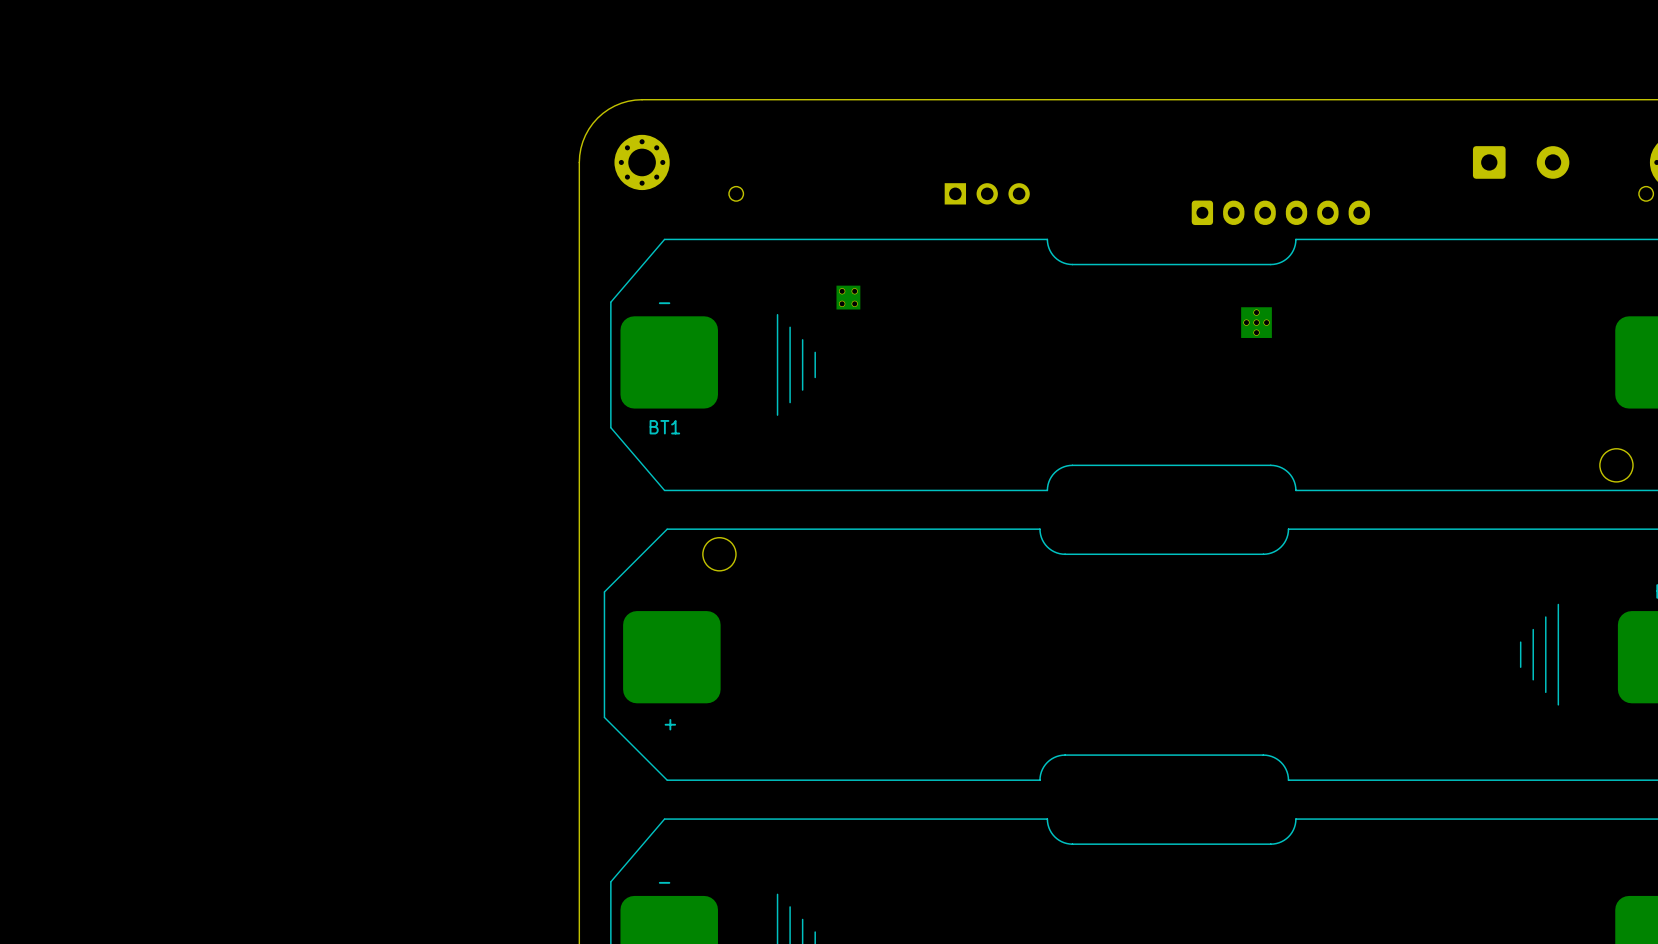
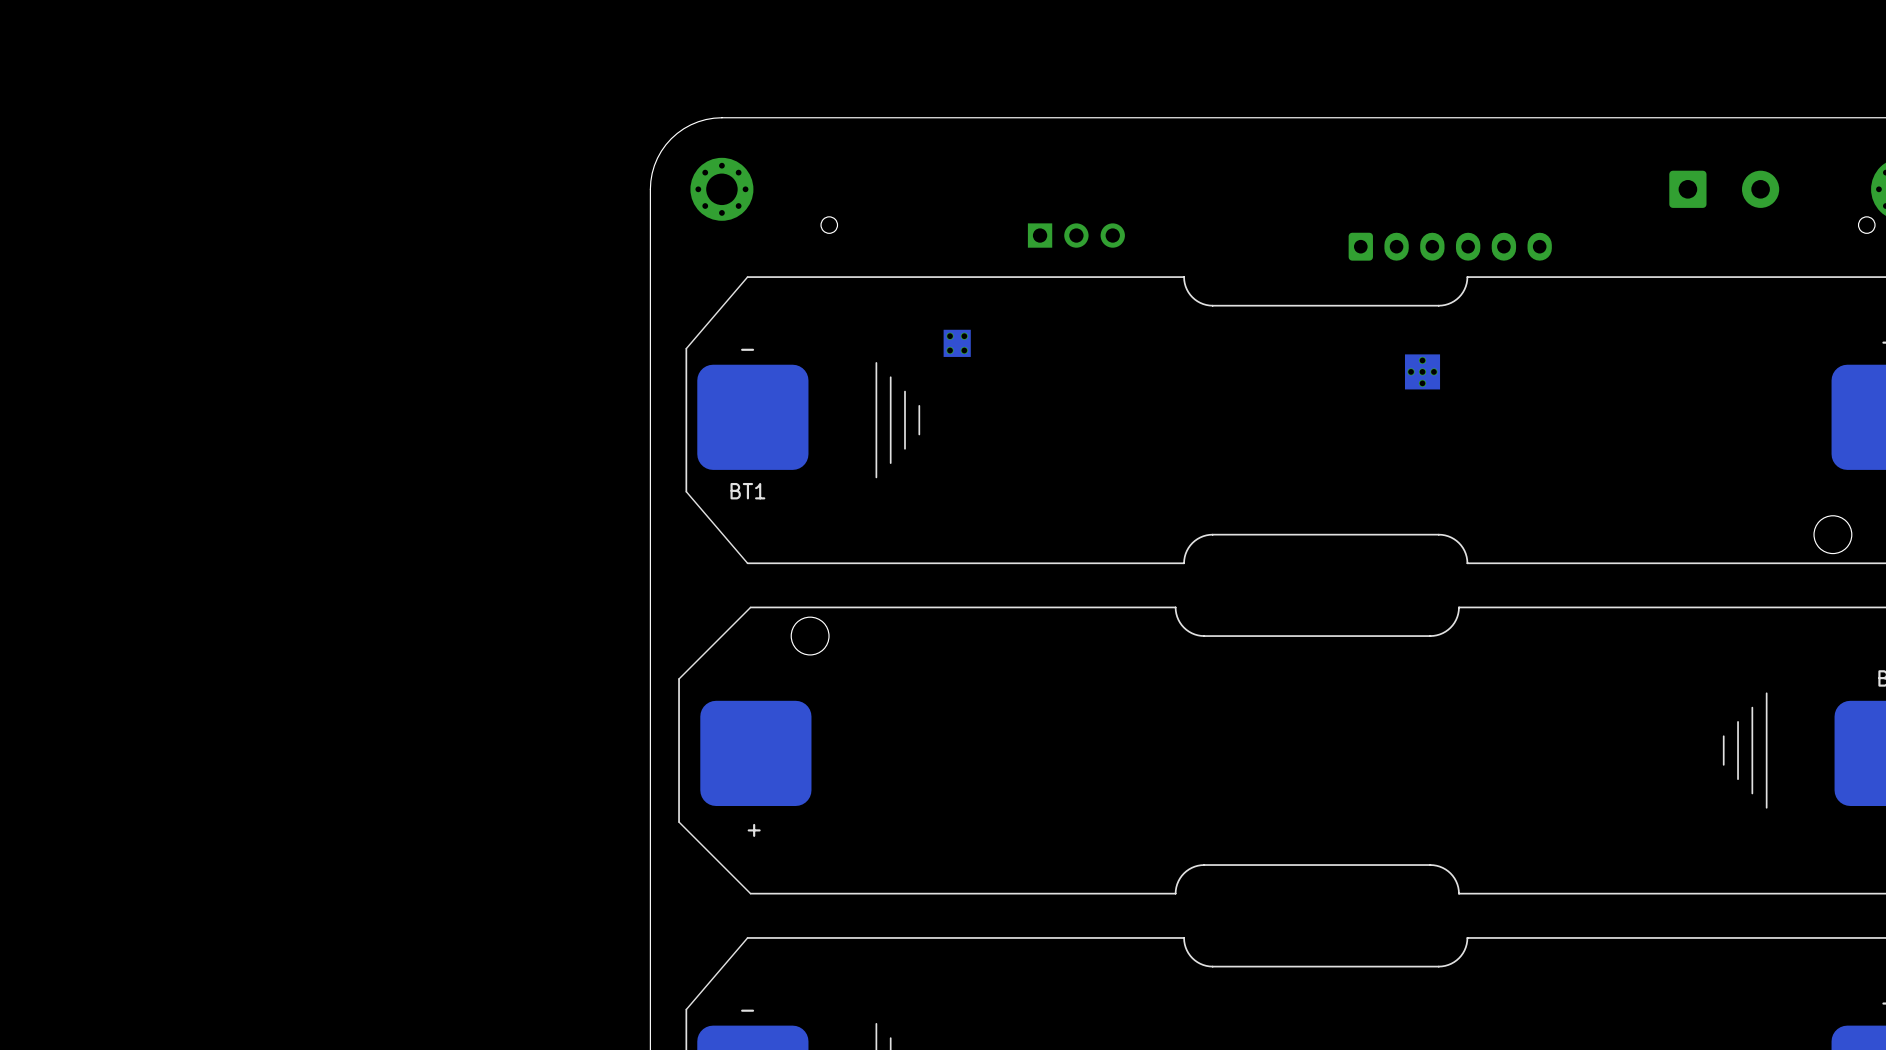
part position: (987, 193) -> (1076, 235)

